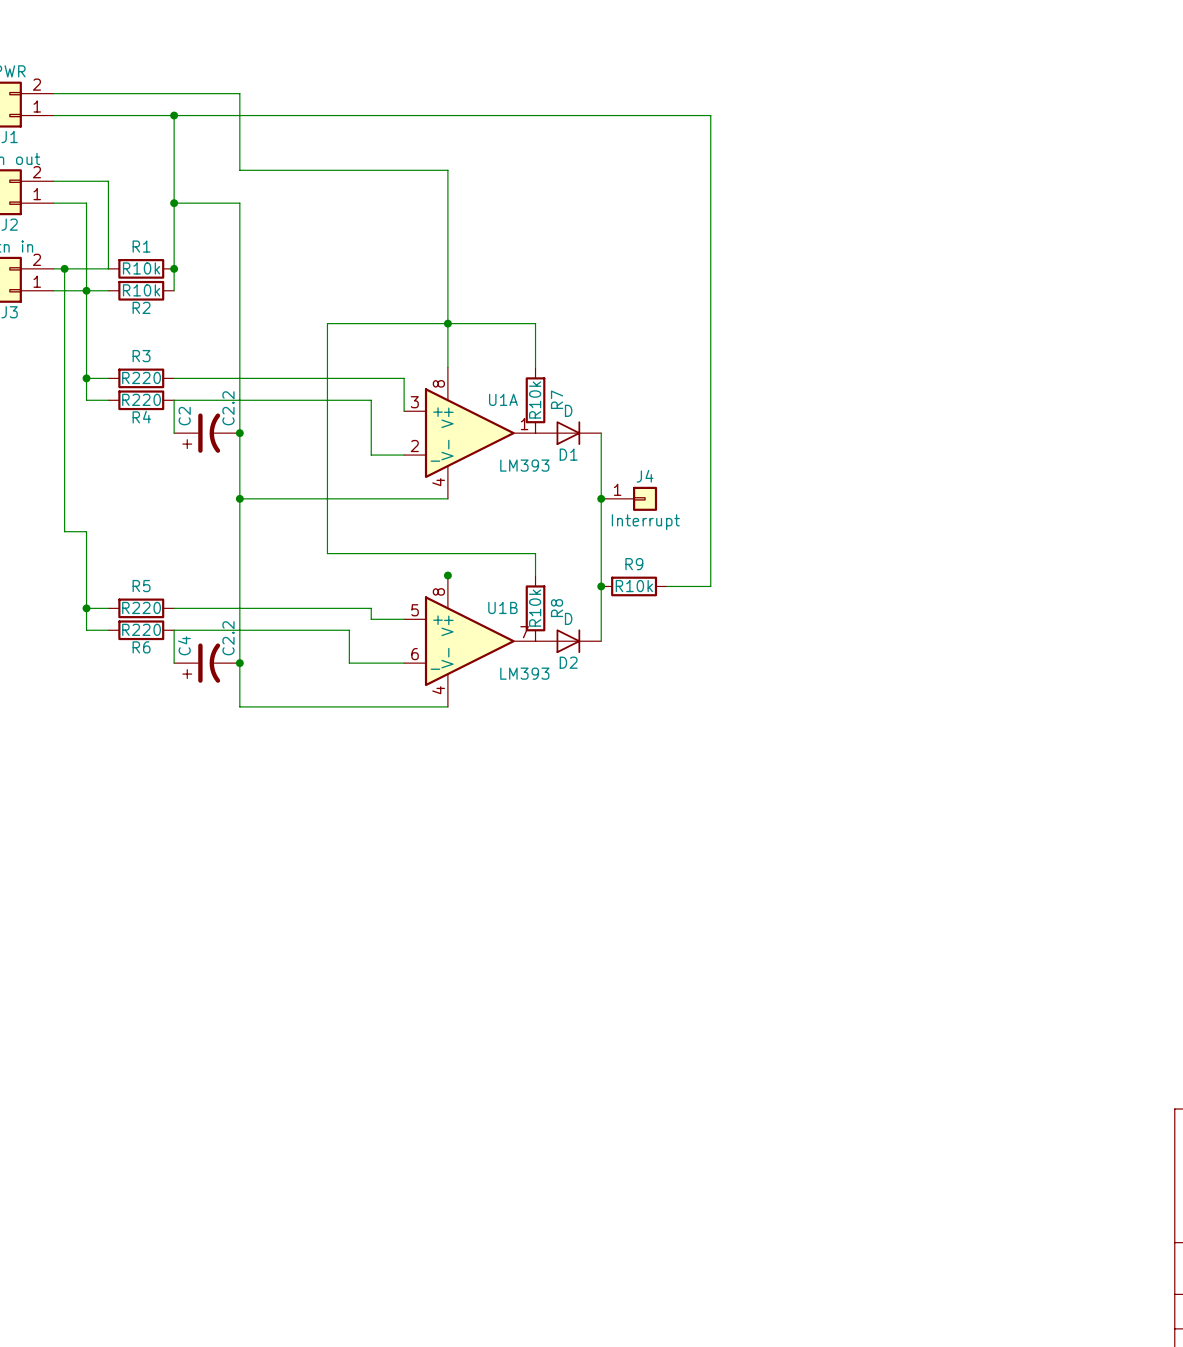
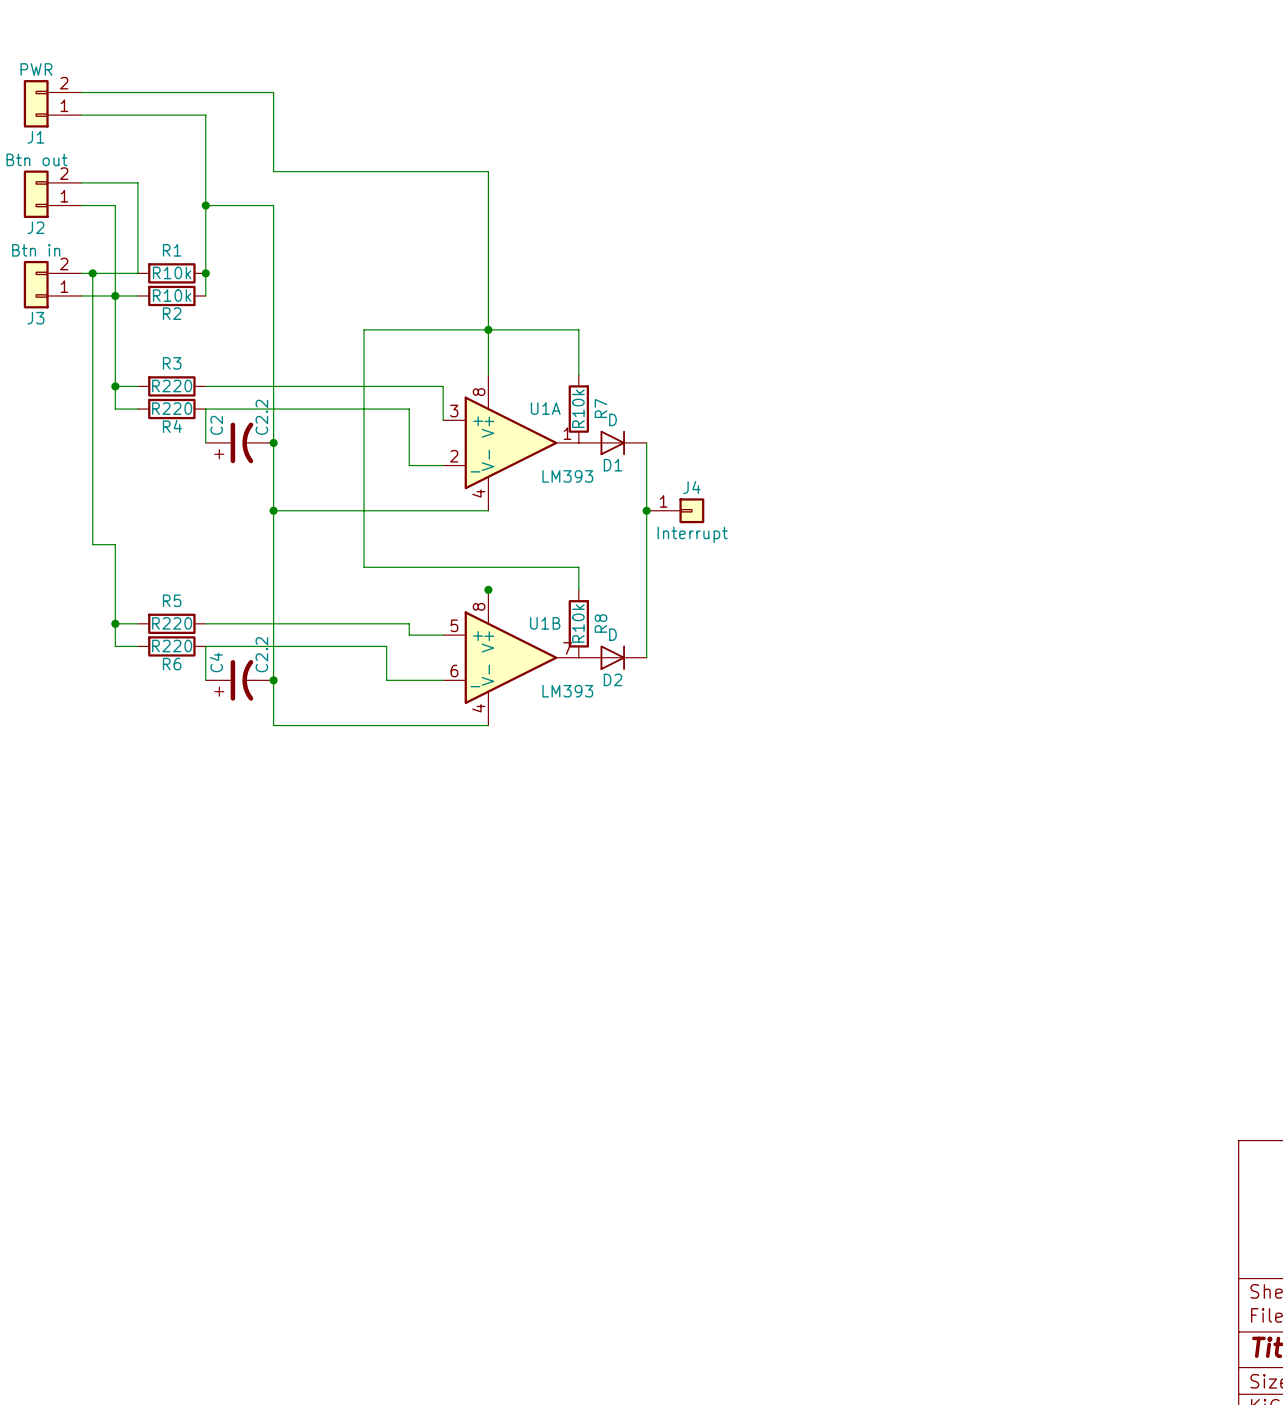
wire: (174, 115) (710, 115) (710, 586) (666, 586) -> none
junction: (174, 115) -> none
junction: (601, 586) -> none
R9: R10k (634, 586) -> none

